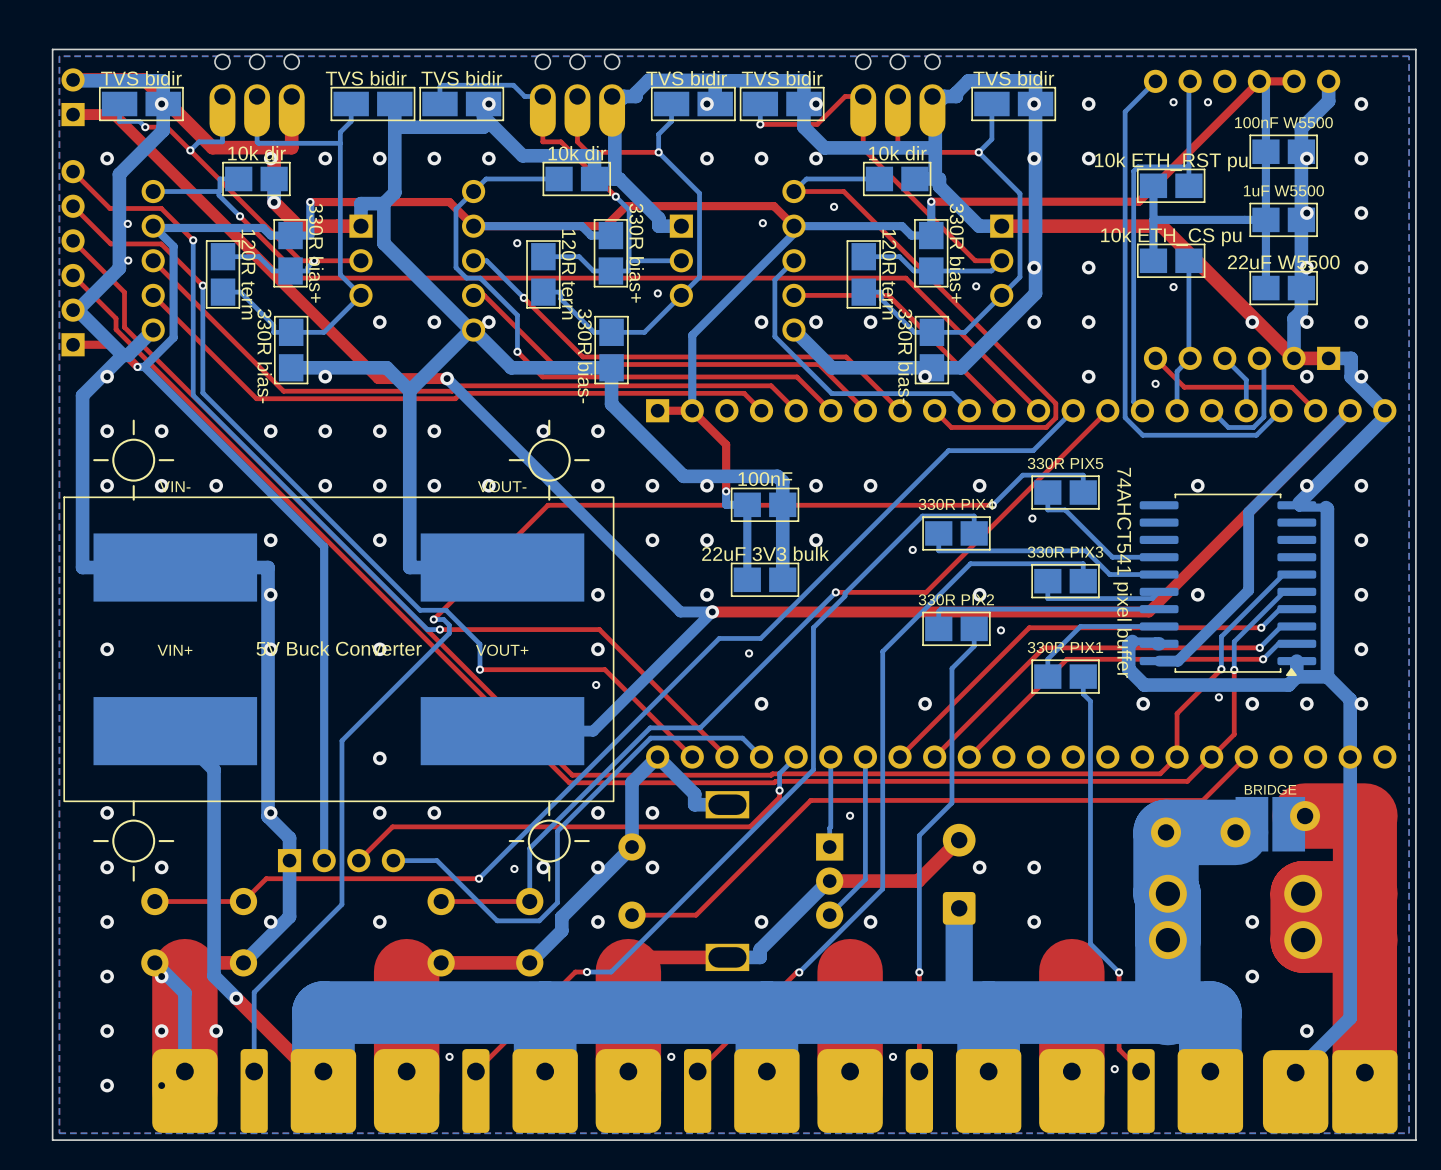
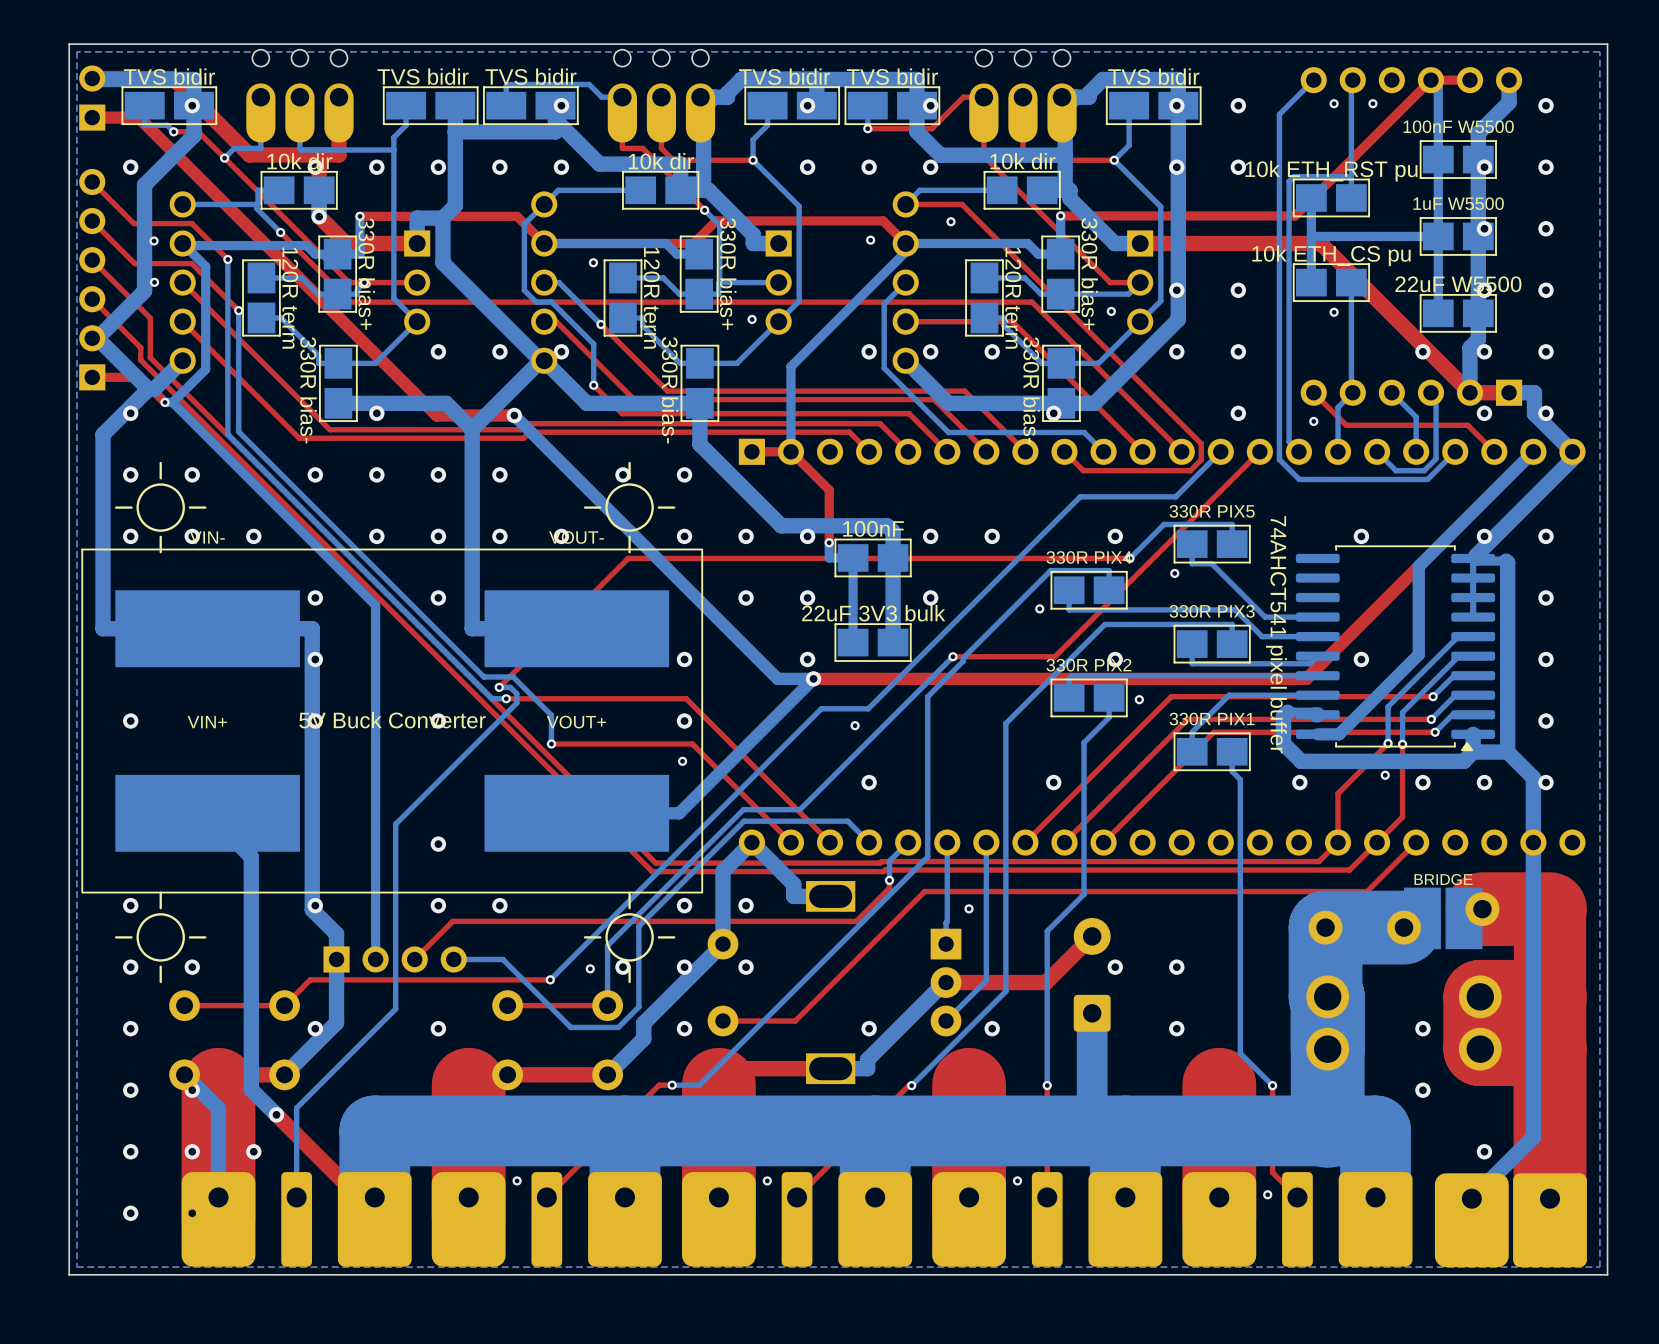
bottom track: none -> (1473, 558) (1473, 617)

